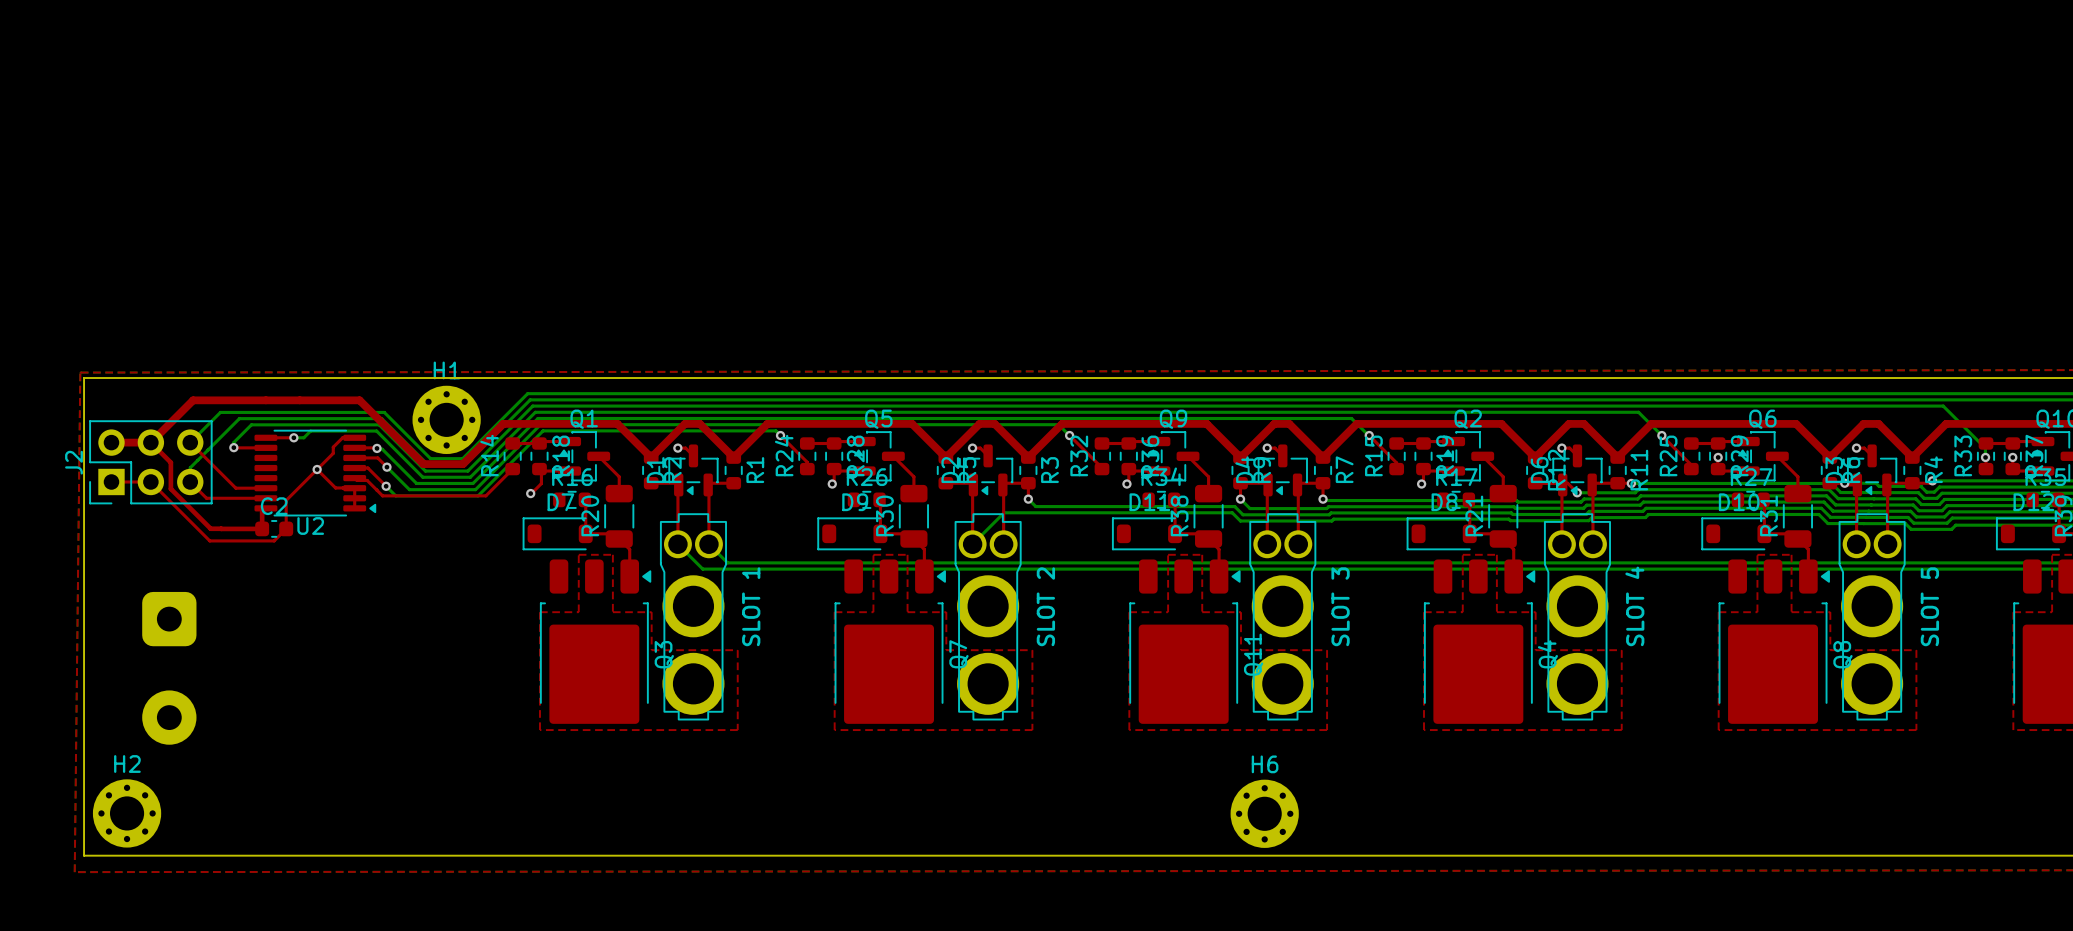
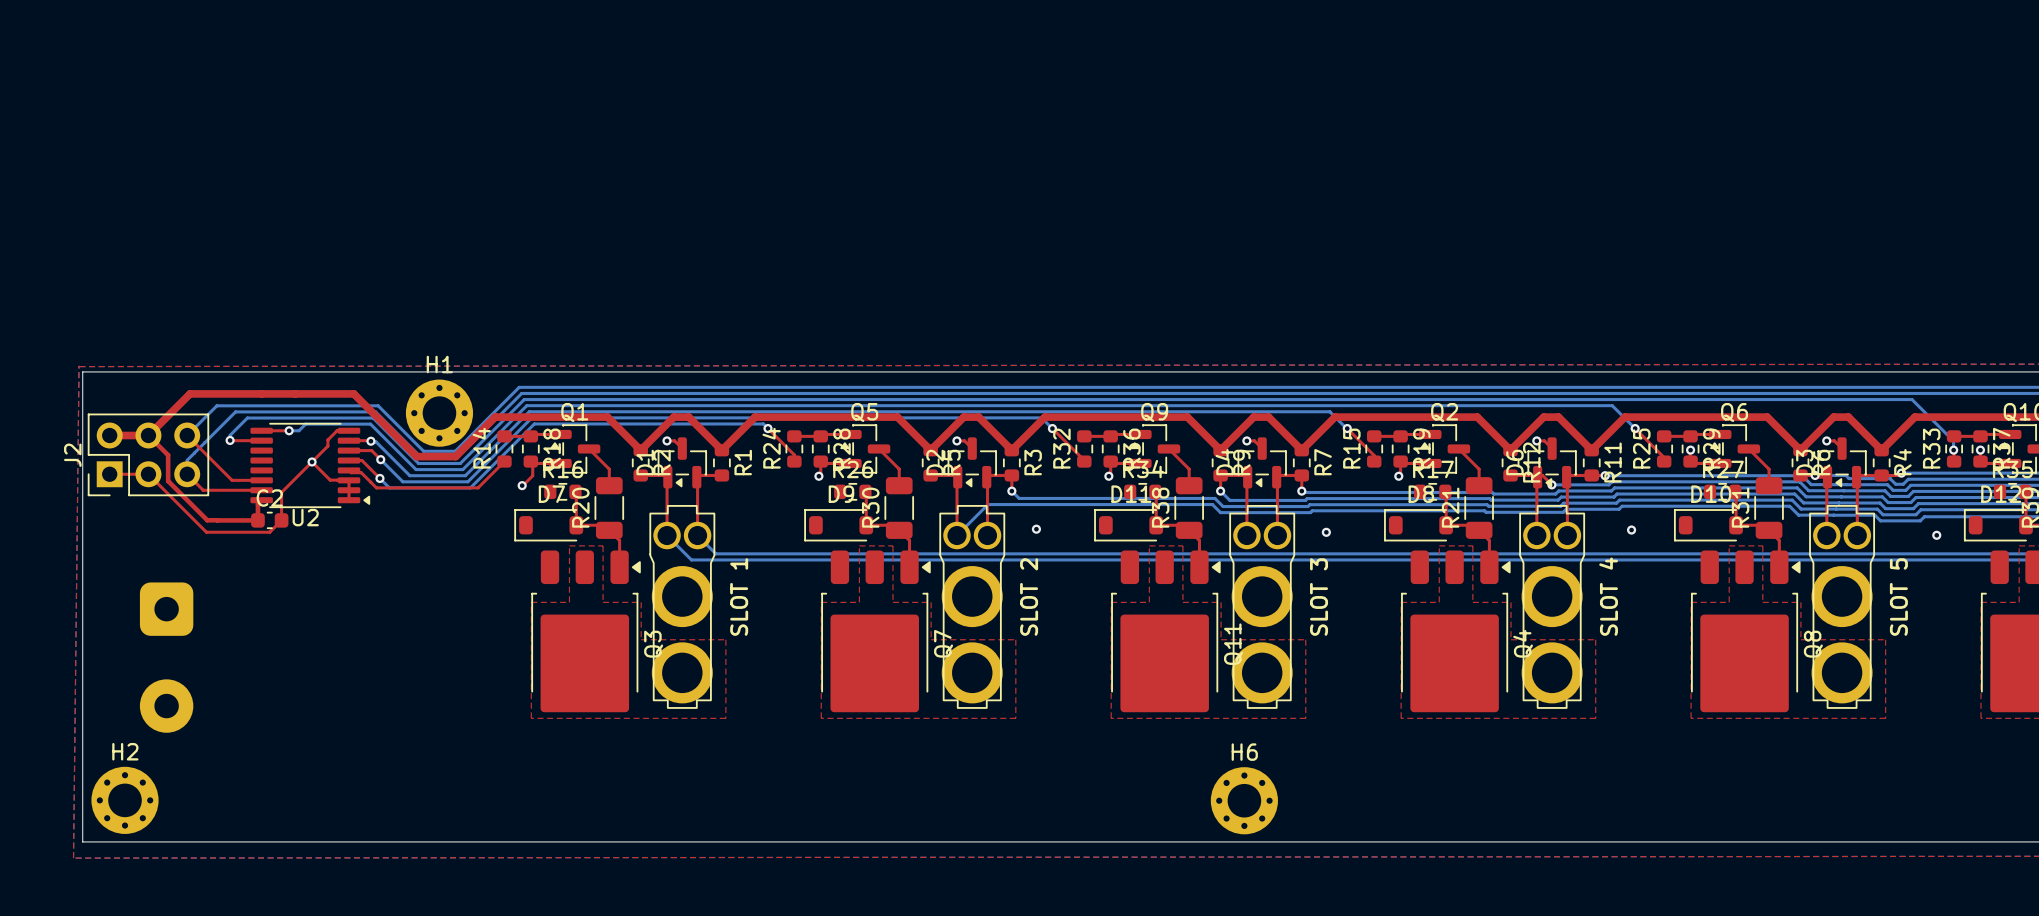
via: none -> (1036, 529)
via: none -> (1631, 530)
via: none -> (1326, 532)
via: none -> (1936, 535)

